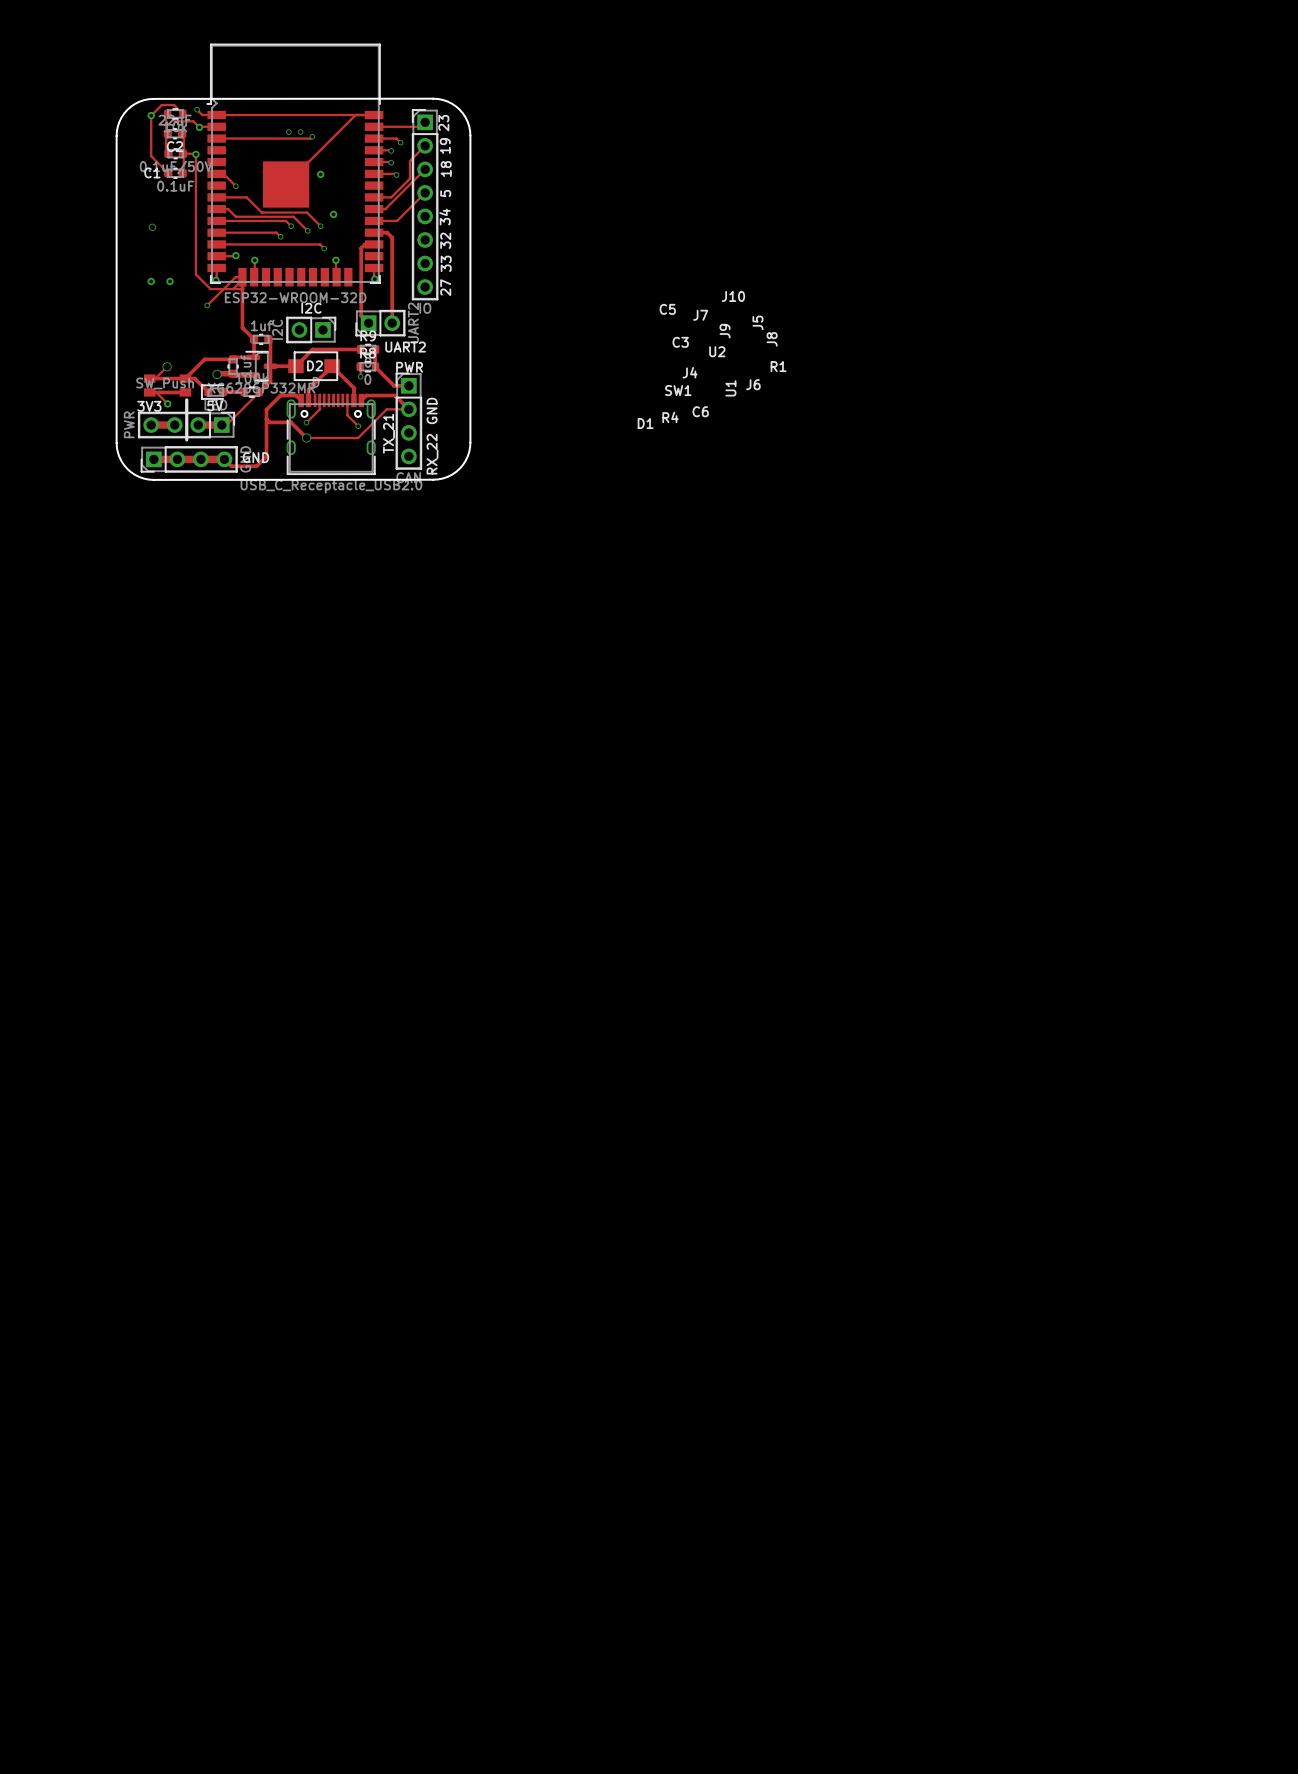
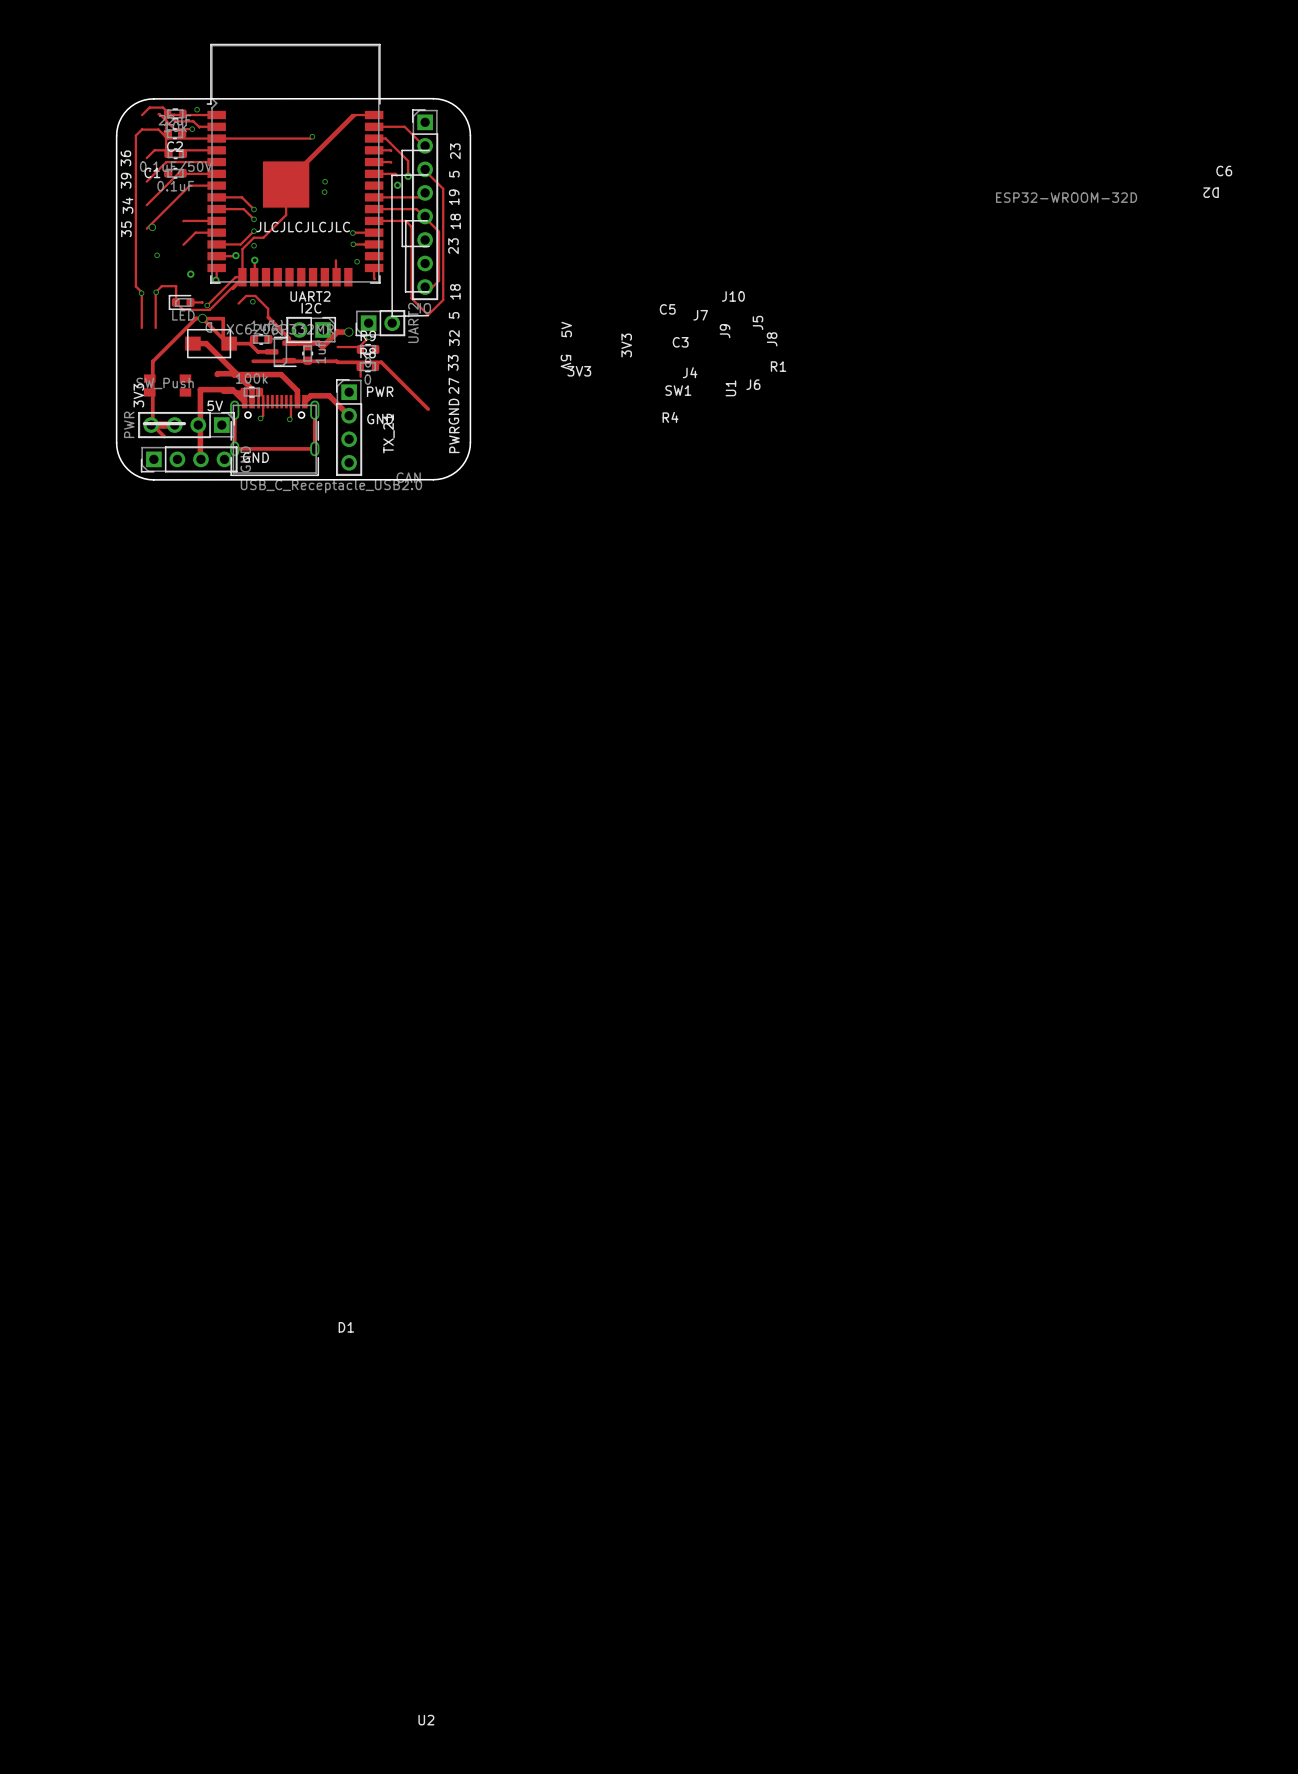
track: (197, 109) (202, 115) -> (142, 115) (149, 107) (163, 107) (170, 114) (202, 115)
track: (183, 113) (174, 105) (161, 105) (151, 115) (151, 156) (168, 173) -> none
track: none -> (158, 114) (174, 129) (192, 129)
via: (151, 115) -> none
track: (216, 115) (352, 115) -> (155, 327) (155, 292) (161, 286) (176, 286) (175, 302) (183, 309) (209, 309) (242, 277) (242, 249) (253, 237) (263, 237) (286, 215) (286, 181) (352, 115)
track: (425, 122) (420, 126) (404, 126) -> (428, 150) (404, 126)
text position: 23 (443, 123) -> 23 (455, 151)
via: (199, 127) -> none
track: none -> (142, 129) (135, 135) (135, 286) (141, 292) (141, 327)
track: none -> (142, 129) (158, 129) (167, 138) (209, 138)
via: none -> (192, 129)
via: (288, 132) -> none
via: (300, 132) -> none
track: (183, 133) (182, 172) -> none
track: (385, 138) (396, 138) (400, 142) -> (385, 138) (408, 161) (408, 176)
via: (400, 142) -> none
track: (425, 145) (410, 160) (410, 178) (391, 197) -> (428, 197) (391, 197)
text position: 19 (445, 145) -> 19 (454, 197)
track: none -> (216, 150) (154, 150) (146, 158)
via: (391, 150) -> none
line: none -> (429, 150) (402, 150) (402, 246) (429, 246)
track: (182, 153) (195, 154) (195, 274) (210, 289) (242, 289) -> none
via: (195, 154) -> none
text: none -> 36 (125, 158)
track: none -> (216, 162) (166, 162) (146, 181)
via: (391, 162) -> none
track: (425, 169) (385, 209) -> (428, 291) (439, 280) (439, 231) (416, 209) (385, 209)
text position: 18 (446, 169) -> 18 (455, 221)
track: (216, 173) (223, 173) (235, 186) -> (216, 173) (178, 173) (146, 205)
via: (320, 174) -> none
line: none -> (427, 174) (391, 175) (392, 316) (428, 315)
via: (396, 175) -> none
via: none -> (408, 176)
text: none -> 39 (126, 180)
via: none -> (325, 181)
track: none -> (216, 185) (189, 185) (146, 228)
via: none -> (397, 185)
via: (235, 186) -> none
via: none -> (324, 192)
track: (425, 192) (397, 220) -> (428, 173) (443, 188) (443, 299) (428, 315) (411, 298) (411, 226) (405, 220) (397, 220)
text position: 5 (445, 193) -> 5 (454, 174)
track: (241, 197) (246, 197) (261, 212) (307, 212) (320, 226) -> (241, 197) (254, 209)
text: none -> 34 (127, 205)
track: (228, 209) (235, 216) (293, 216) (307, 230) -> (228, 209) (243, 209) (254, 219)
via: none -> (254, 209)
via: (333, 214) -> none
text: 34 (445, 217) -> none
via: none -> (254, 219)
track: (216, 220) (285, 220) (291, 226) -> (216, 220) (183, 221)
line: none -> (427, 220) (405, 220) (405, 291) (428, 291)
via: (291, 226) -> none
via: (320, 226) -> none
text: none -> JLCJLCJLCJLC (303, 227)
text: none -> 35 (126, 229)
via: (307, 230) -> none
via: none -> (254, 231)
track: (216, 232) (276, 232) (280, 236) -> (216, 232) (195, 232) (183, 244)
track: (374, 232) (387, 232) (392, 237) (392, 323) -> (374, 232) (352, 233)
via: none -> (352, 233)
via: (280, 236) -> none
text position: 32 (445, 240) -> 32 (454, 338)
track: (240, 244) (320, 244) (324, 248) -> (240, 244) (254, 231)
via: none -> (353, 244)
track: (365, 244) (361, 248) (361, 315) (368, 323) -> (365, 244) (353, 244)
via: none -> (254, 245)
text: none -> 23 (453, 246)
via: (324, 248) -> none
via: none -> (157, 255)
via: (335, 260) -> none
via: none -> (357, 261)
text position: 33 (446, 263) -> 33 (453, 362)
via: none -> (190, 274)
track: (242, 277) (242, 327) (254, 339) (254, 356) (235, 357) (233, 359) (204, 359) (185, 378) -> none
via: (374, 279) -> none
via: (151, 281) -> none
via: (170, 281) -> none
text position: 27 (445, 287) -> 27 (453, 385)
text: none -> 18 (455, 291)
via: none -> (156, 292)
via: none -> (141, 293)
U1 value position: ESP32-WROOM-32D (295, 297) -> ESP32-WROOM-32D (1066, 197)
via: none -> (252, 301)
track: none -> (190, 302) (202, 302)
track: none -> (238, 303) (246, 295) (255, 295) (268, 308) (268, 317) (289, 338) (289, 343) (318, 343) (322, 346) (337, 332) (348, 332)
text: none -> 5 (454, 315)
track: none -> (202, 318) (223, 318) (223, 337) (229, 343)
via: none -> (202, 318)
text: none -> 5V (566, 329)
via: none -> (348, 332)
track: none -> (368, 337) (359, 347) (337, 347)
track: (268, 339) (270, 341) (270, 381) (226, 425) (198, 425) -> none
track: none -> (192, 343) (206, 343) (252, 389) (252, 401)
text: none -> 3V3 (626, 345)
text position: UART2 (405, 347) -> UART2 (310, 296)
track: (360, 349) (312, 349) (295, 366) (270, 366) -> none
track: (375, 349) (375, 366) (394, 385) (408, 385) -> none
track: none -> (271, 351) (258, 351) (249, 343) (227, 343) (202, 318) (195, 318) (152, 361) (152, 425) (164, 436)
U2 name position: U2 (717, 351) -> U2 (426, 1720)
track: none -> (253, 361) (381, 362) (428, 409)
text: none -> 5V (565, 362)
D2 name position: D2 (314, 365) -> D2 (1211, 192)
track: (167, 366) (155, 378) (149, 378) (194, 378) (208, 392) -> none
via: (167, 366) -> none
C6 position: (233, 366) -> (307, 353)
U2 rotation: 0° (261, 366) -> 180° (280, 351)
U2 position: (261, 366) -> (280, 351)
D2 rotation: 0° (314, 366) -> 180° (211, 343)
D2 position: (314, 366) -> (211, 343)
text position: PWR (409, 367) -> PWR (380, 391)
text: none -> 3V3 (579, 371)
via: (217, 374) -> none
track: none -> (237, 374) (281, 374) (297, 390) (297, 401)
via position: (360, 376) -> (368, 337)
track: (185, 392) (149, 392) (156, 392) (167, 403) -> none
D1 position: (214, 392) -> (181, 302)
line: (186, 399) (186, 439) -> none
track: (301, 400) (296, 395) (280, 395) (266, 409) (266, 456) (256, 466) (231, 466) (224, 459) (153, 459) -> none
track: (308, 400) (308, 389) (332, 366) (353, 388) (353, 400) -> none
track: (319, 400) (319, 409) (306, 422) -> none
track: (347, 400) (347, 415) (358, 426) -> none
track: (361, 400) (366, 395) (395, 395) (408, 409) (386, 409) (358, 437) (306, 437) (290, 422) (269, 422) (266, 419) -> none
track: none -> (244, 401) (232, 389) (200, 389) (200, 460)
track: none -> (263, 401) (263, 415) (260, 418)
track: none -> (290, 401) (289, 419)
track: none -> (304, 401) (310, 395) (329, 395) (349, 415)
via: (167, 403) -> none
text rotation: 0° (149, 406) -> 90° counterclockwise (138, 395)
track: none -> (234, 410) (234, 448) (314, 448) (314, 410)
text position: GND (432, 410) -> GND (453, 411)
C6 name position: C6 (700, 411) -> C6 (1224, 171)
via: none -> (260, 418)
text: none -> GND (380, 419)
J4 position: (408, 421) -> (349, 427)
via position: (306, 422) -> (289, 419)
line: none -> (144, 423) (184, 423)
D1 name position: D1 (645, 423) -> D1 (346, 1327)
via: (358, 426) -> none
J10 position: (331, 434) -> (274, 435)
via: (306, 437) -> none
text: none -> PWR (454, 439)
text: RX_22 (432, 454) -> none

